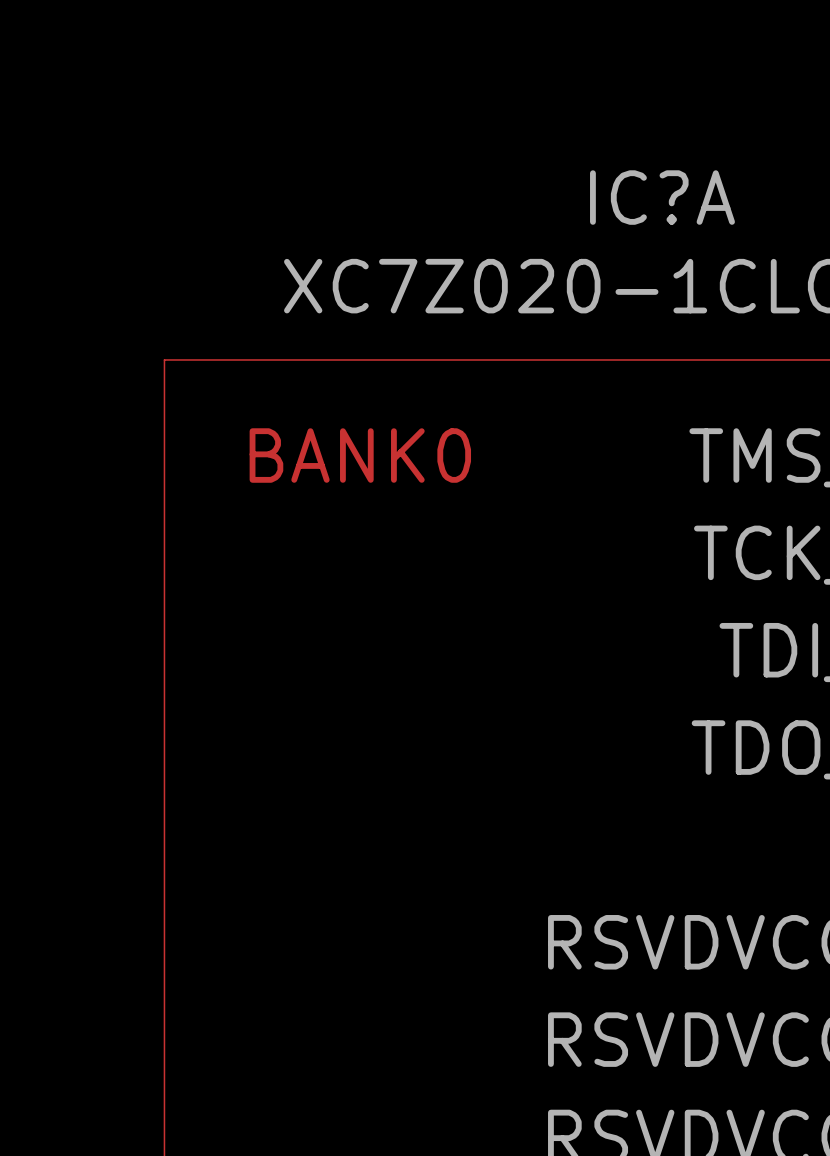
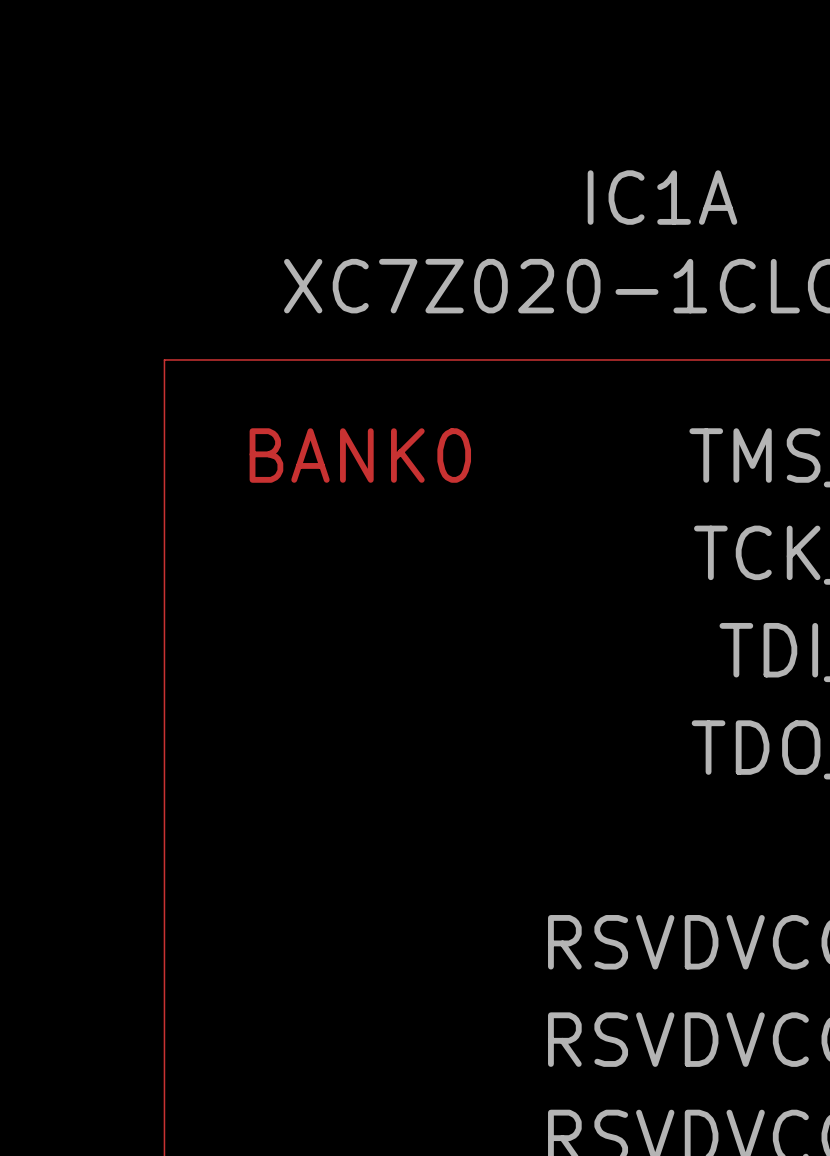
IC?A name: IC?A (662, 197) -> IC1A (662, 197)

